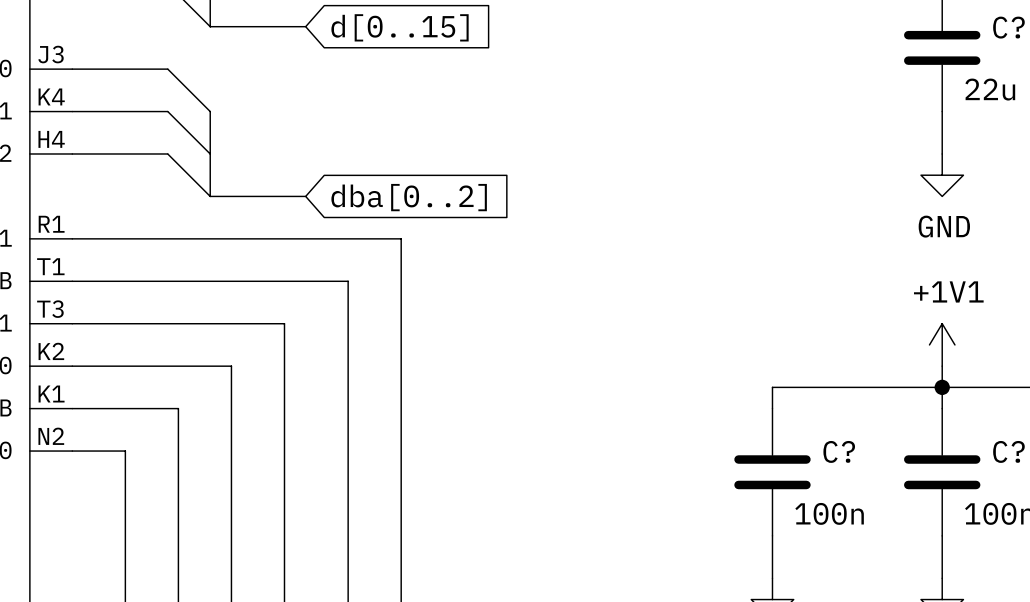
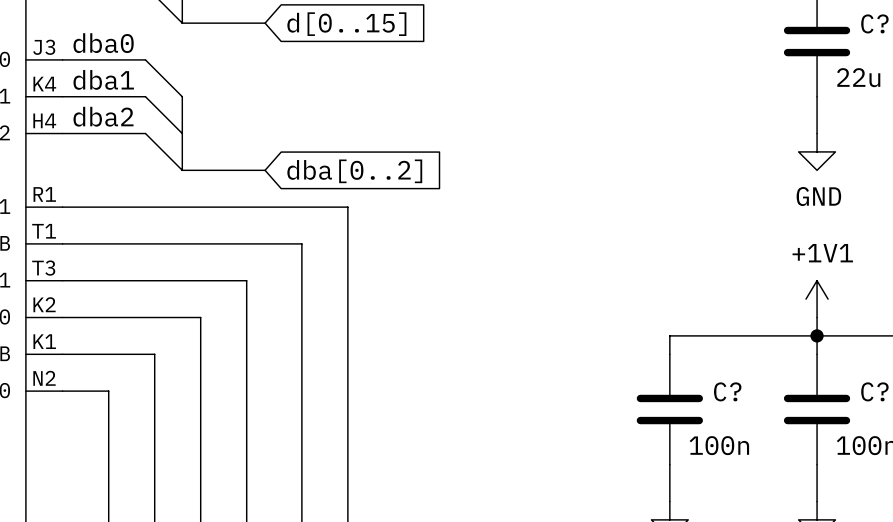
label: none -> dba0 (103, 43)
label: none -> dba1 (103, 79)
label: none -> dba2 (103, 116)

